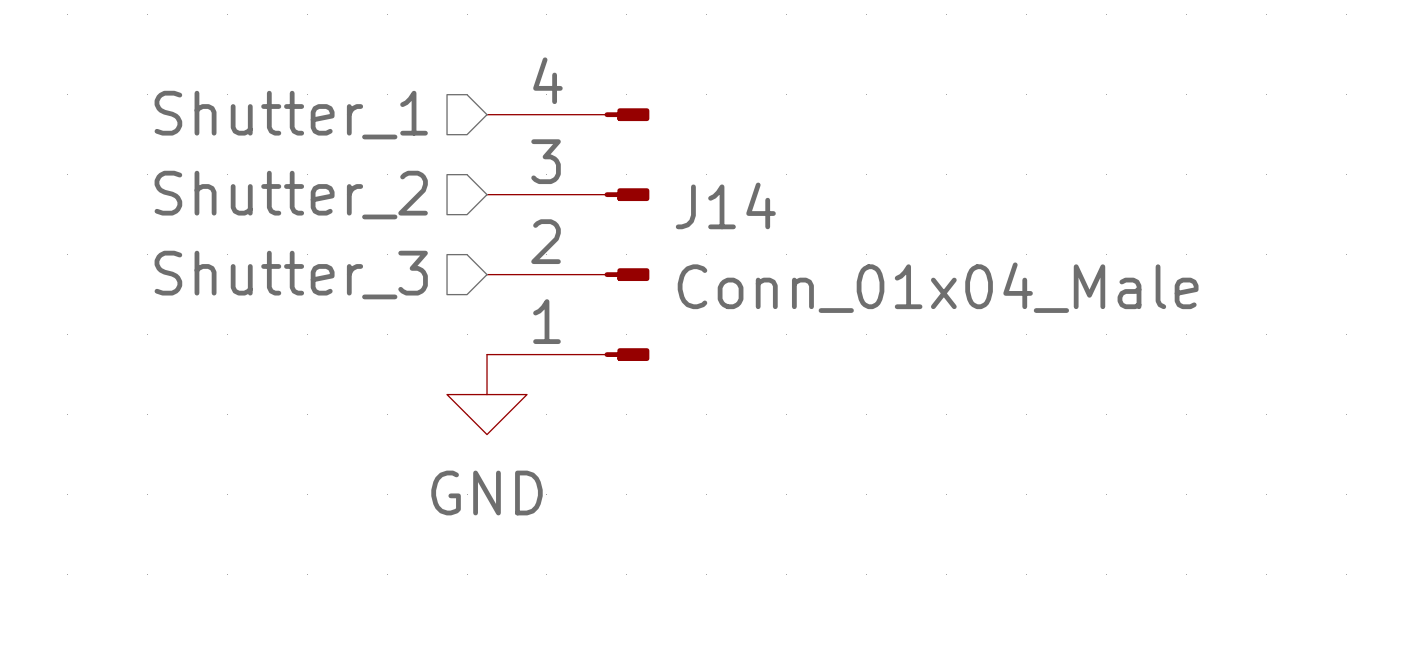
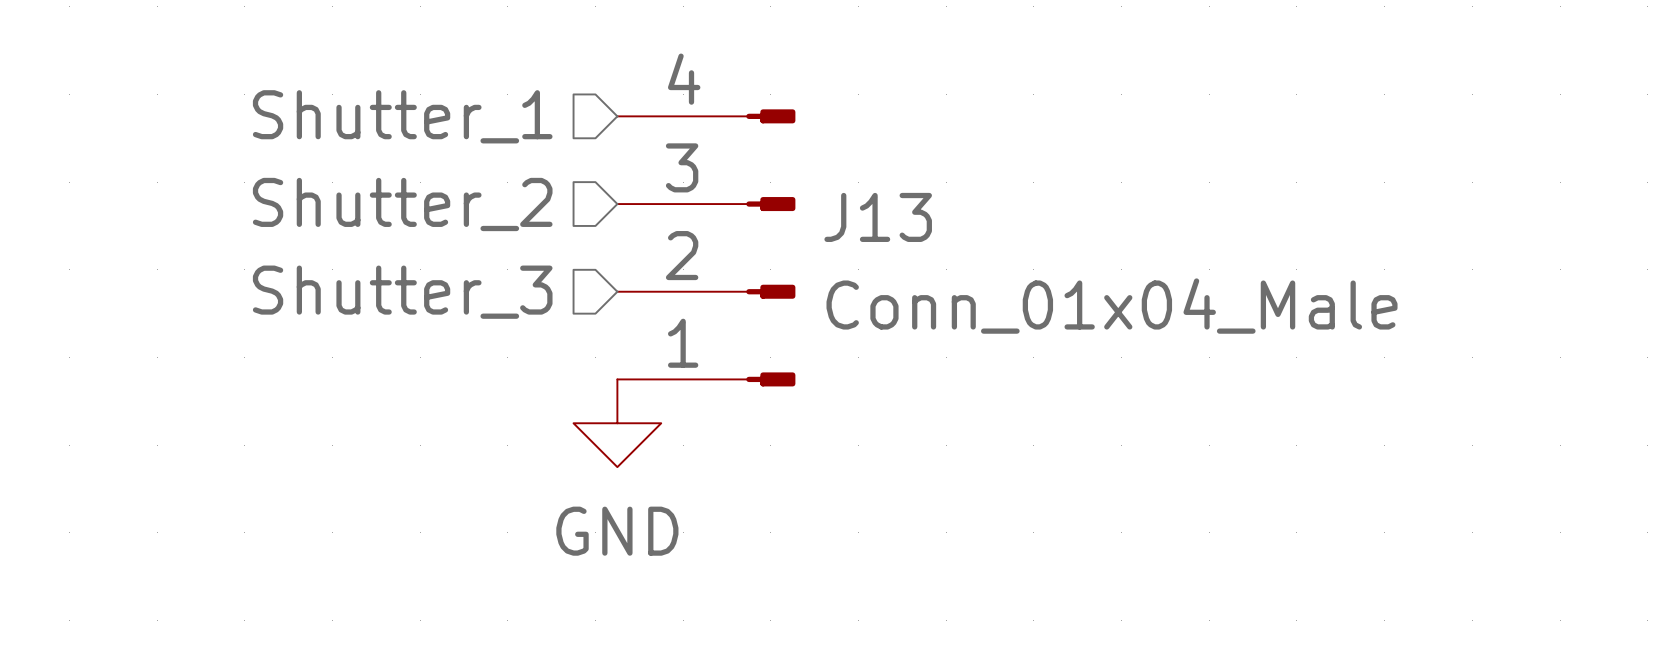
J14 name: J14 (725, 205) -> J13 (878, 217)

